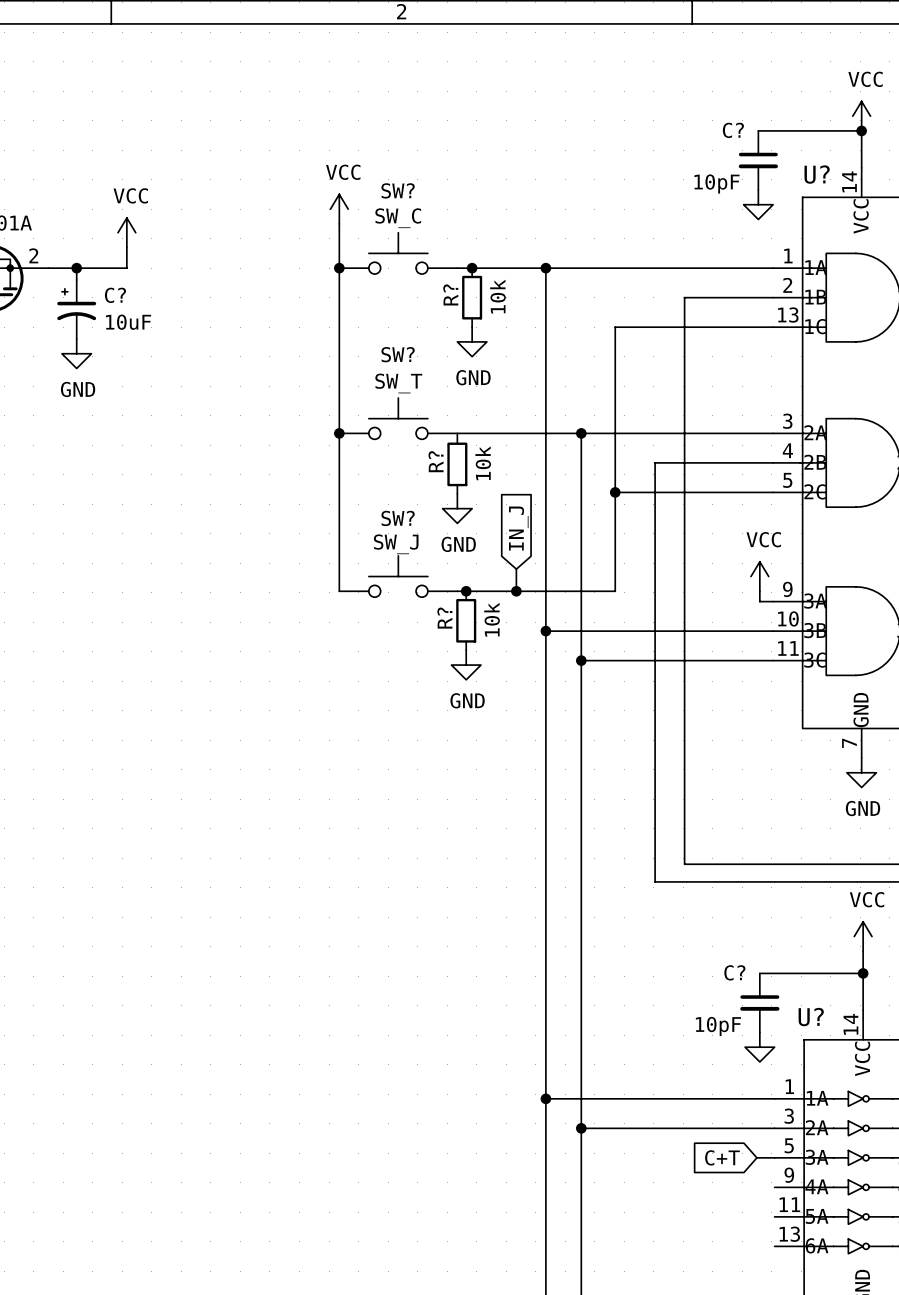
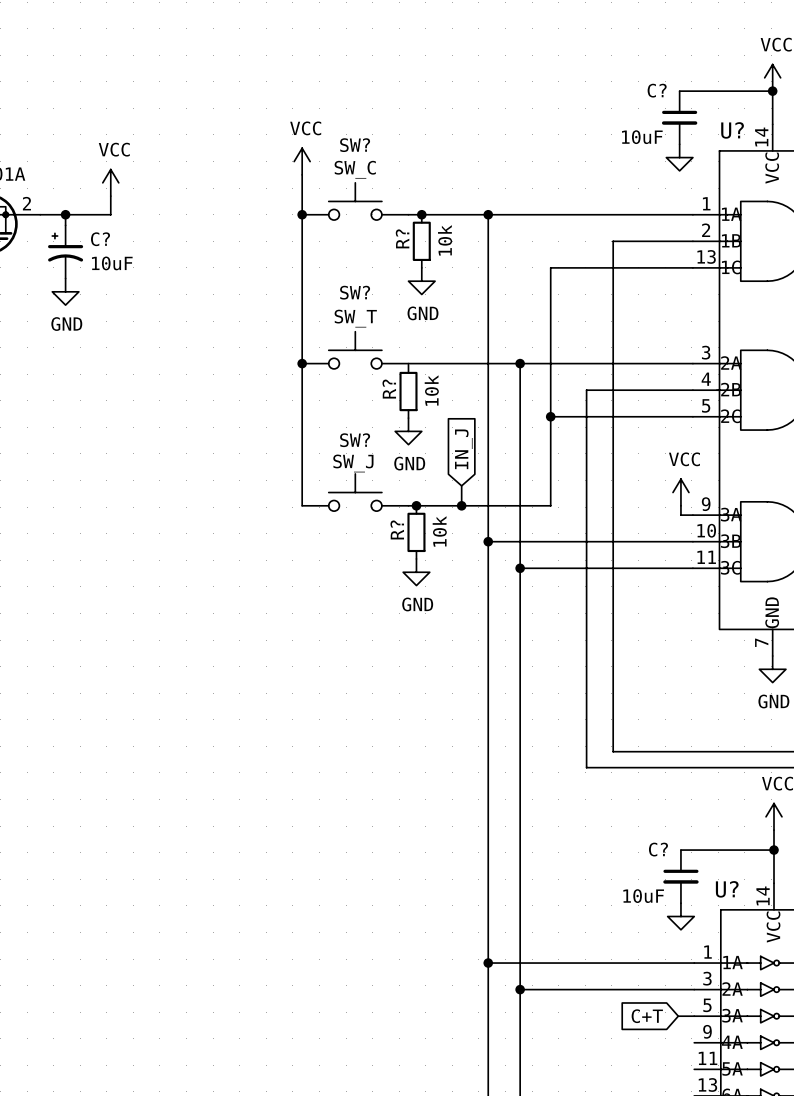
C? value: 10pF (716, 183) -> 10uF (642, 137)
C? value: 10pF (718, 1026) -> 10uF (643, 896)

